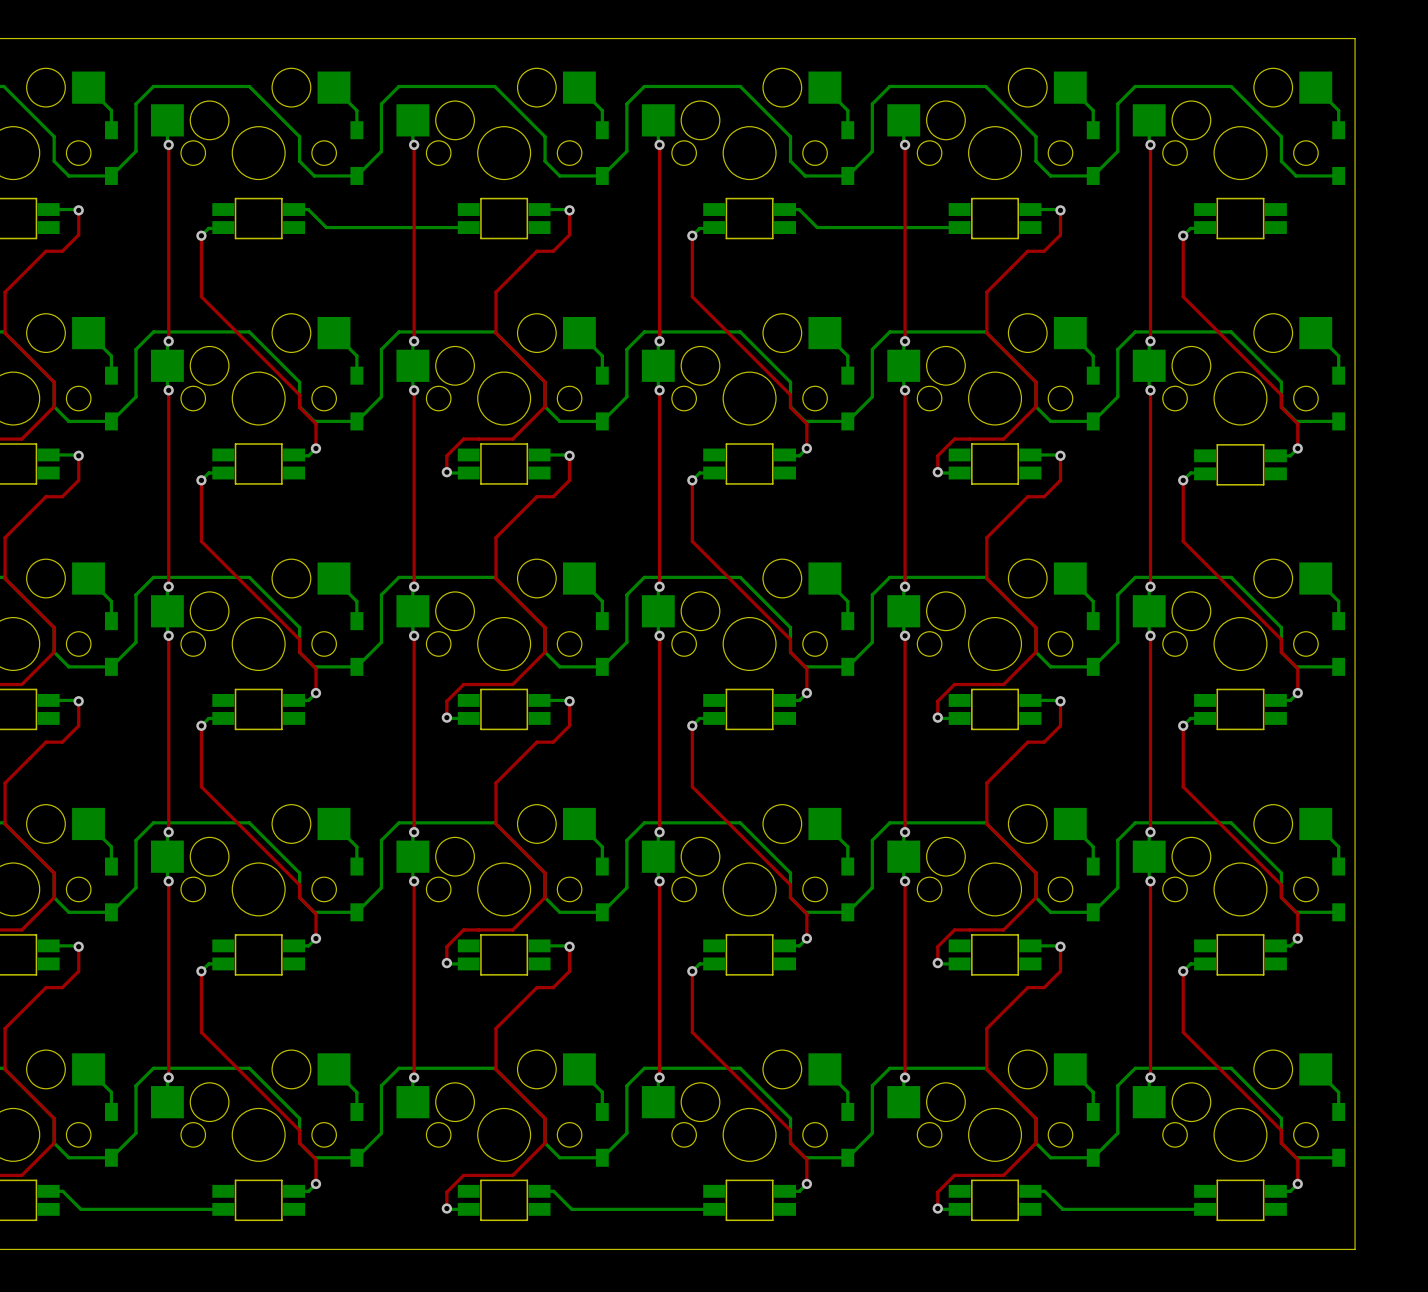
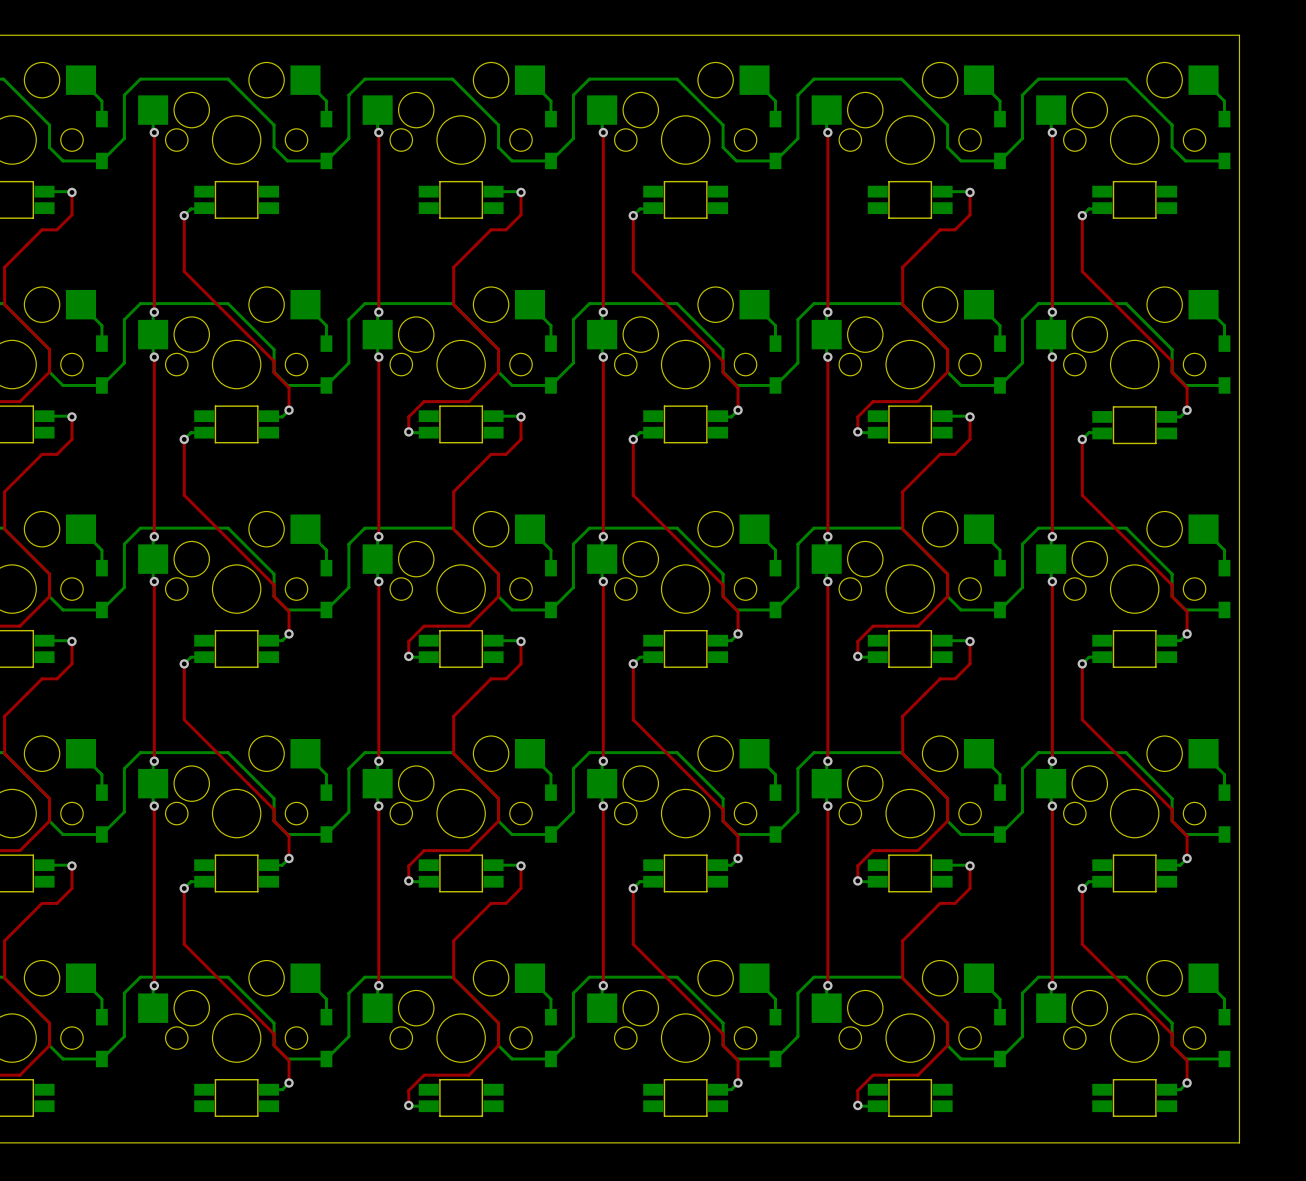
bottom track: (294, 209) (308, 209) (326, 227) (468, 227) -> none
bottom track: (785, 209) (799, 209) (817, 227) (959, 227) -> none
bottom track: (48, 1191) (62, 1191) (80, 1209) (223, 1209) -> none
bottom track: (539, 1191) (553, 1191) (571, 1209) (714, 1209) -> none
bottom track: (1030, 1191) (1044, 1191) (1062, 1209) (1205, 1209) -> none

